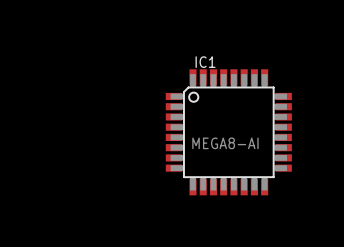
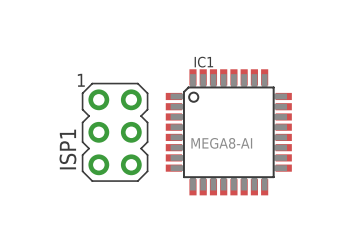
ISP1: none -> (115, 132)

